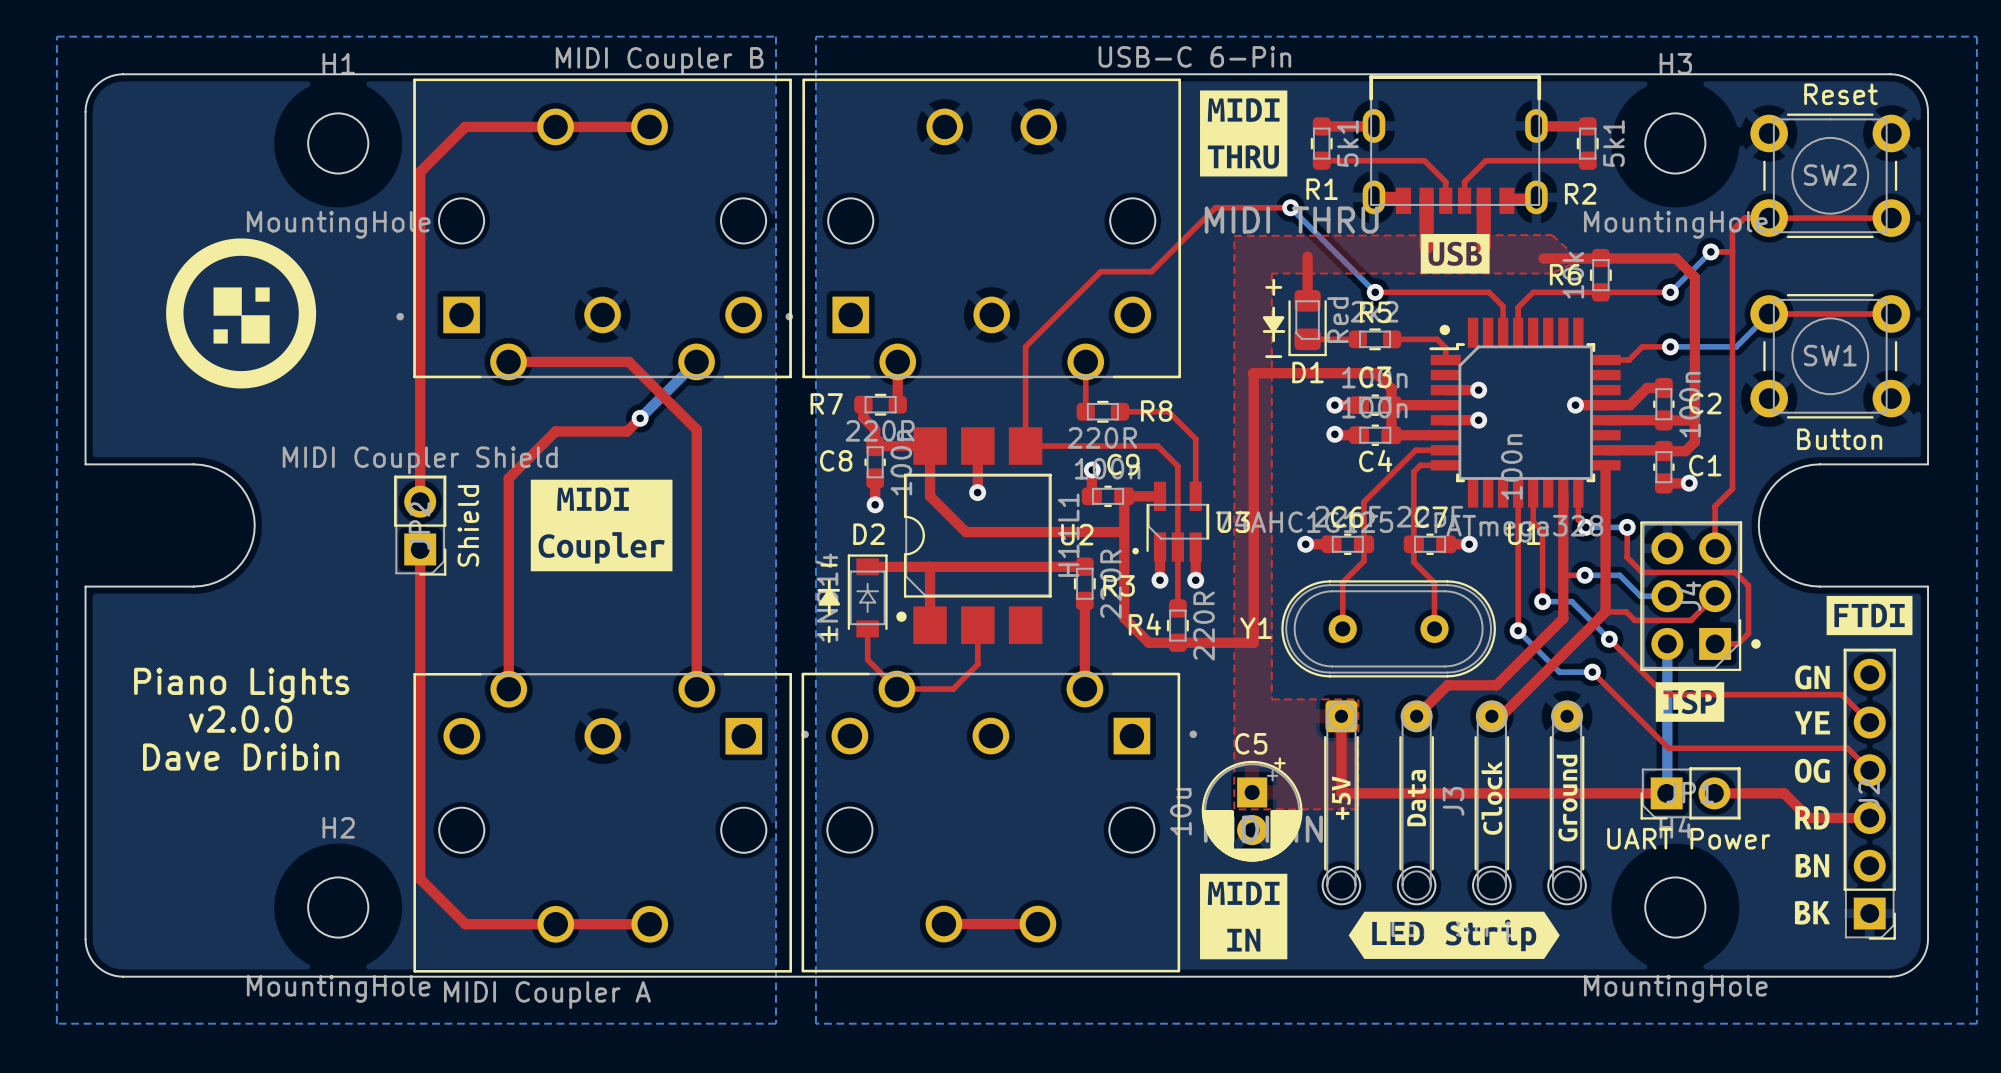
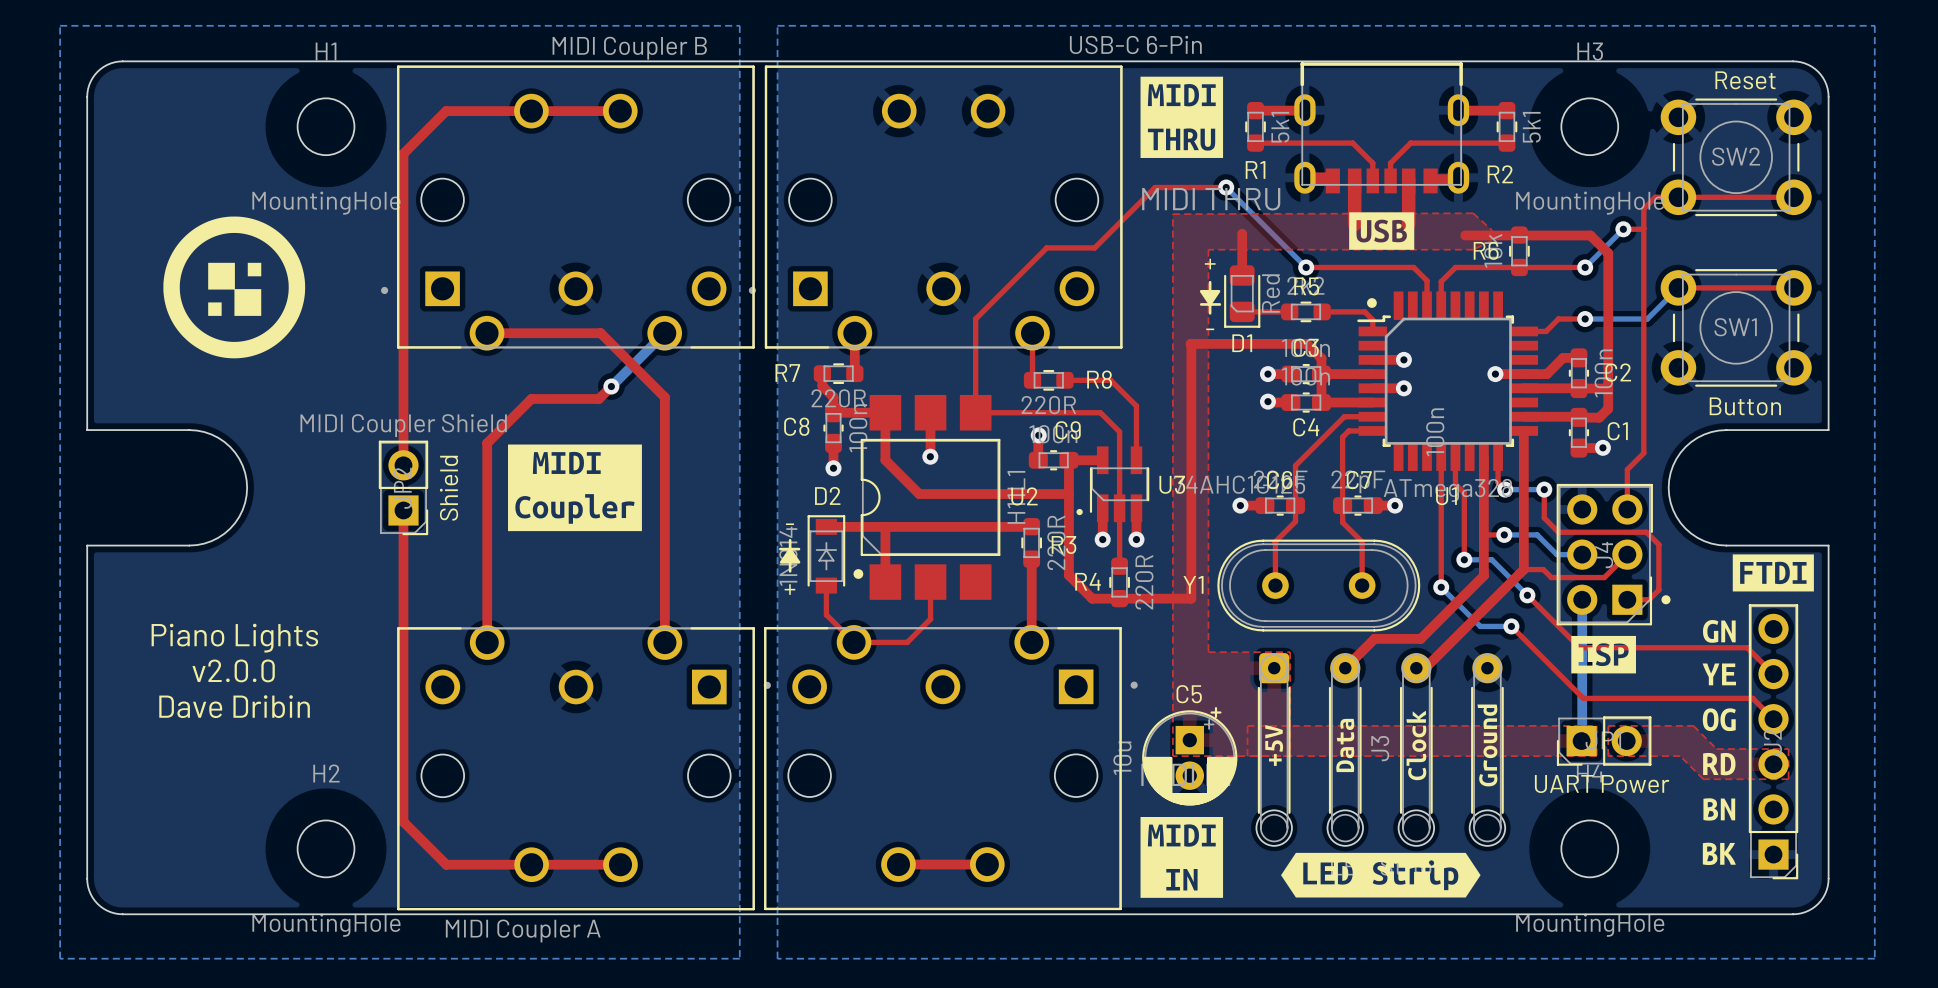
top track: (1341, 716) (1341, 793) (1666, 793) -> none
top zone outline: none -> (1608, 725) (1608, 756) (1680, 756) (1703, 779) (1788, 779) (1788, 749) (1716, 749) (1693, 725) (1608, 725)
top track: (1714, 793) (1784, 793) (1808, 818) (1869, 818) -> none
top zone outline: none -> (1247, 756) (1247, 725) (1596, 725) (1596, 756) (1290, 756)

